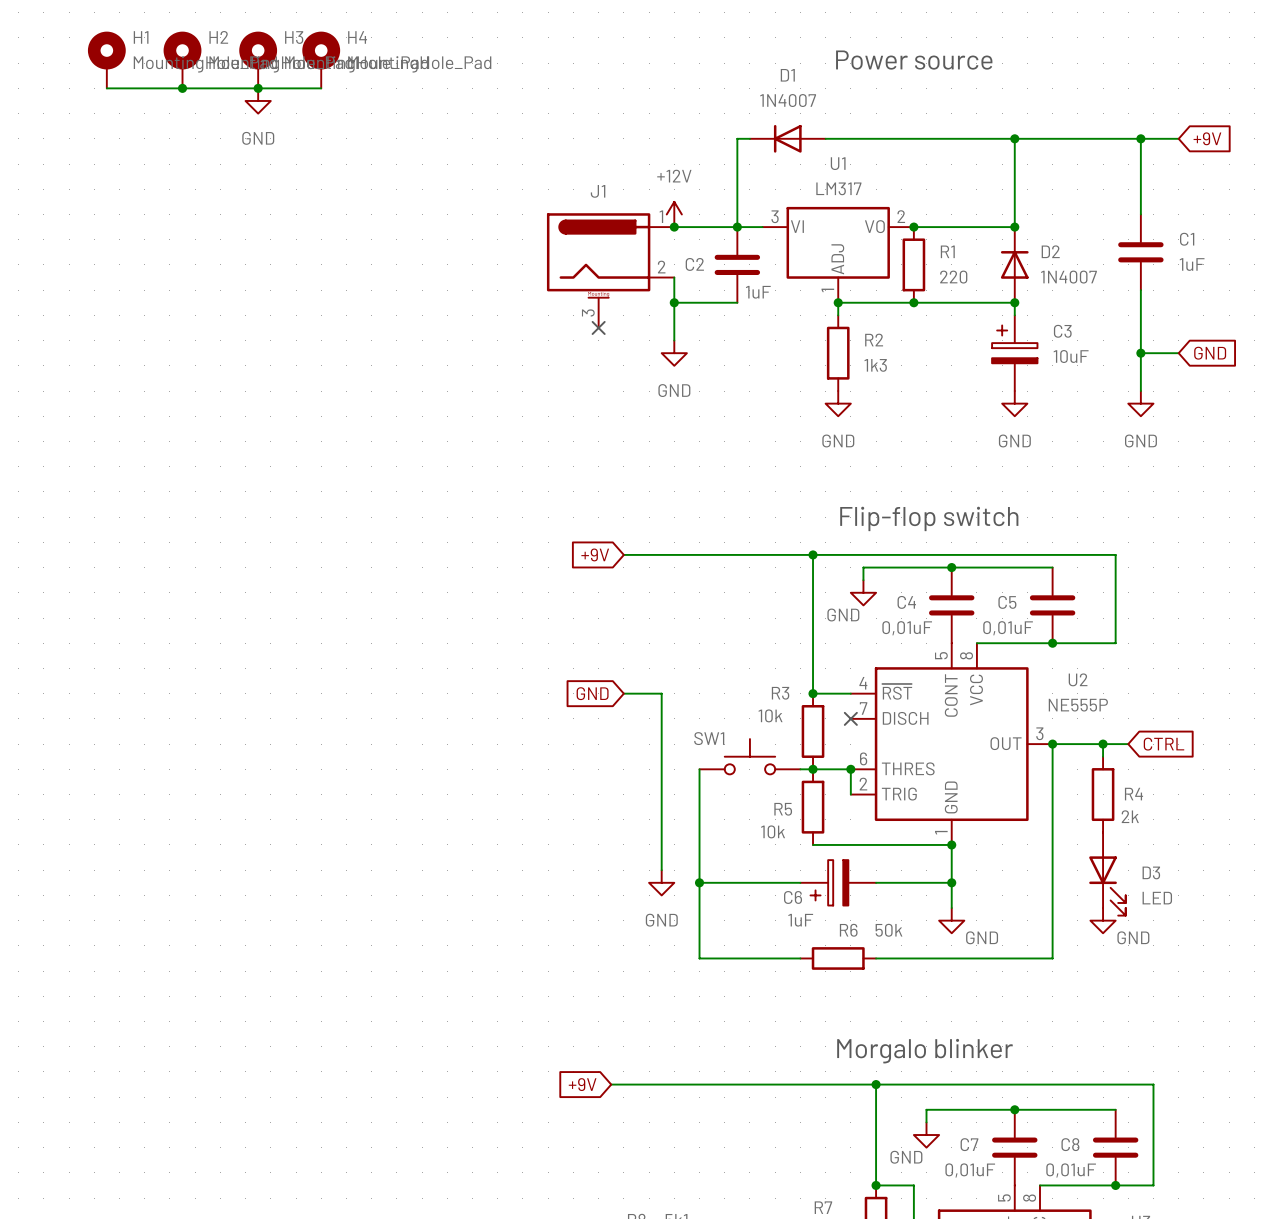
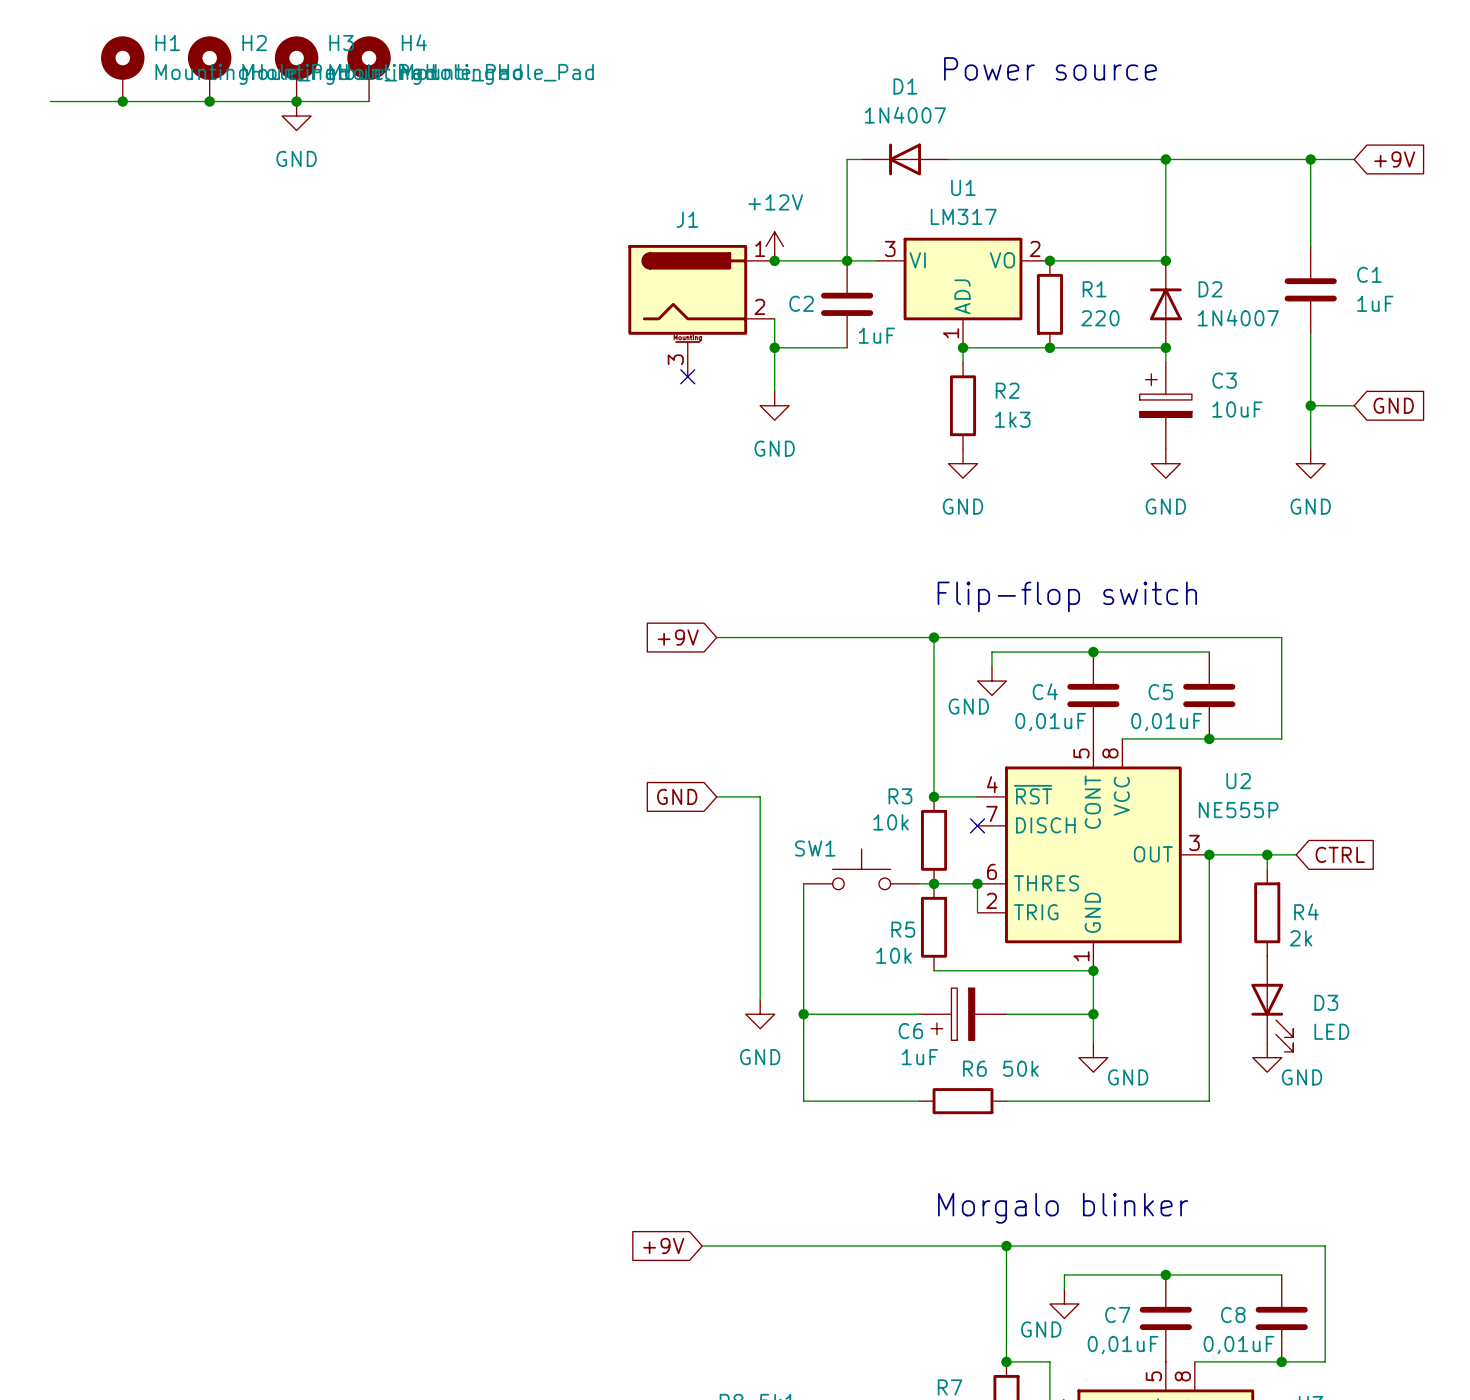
wire: none -> (50, 101) (122, 101)
junction: none -> (122, 101)

